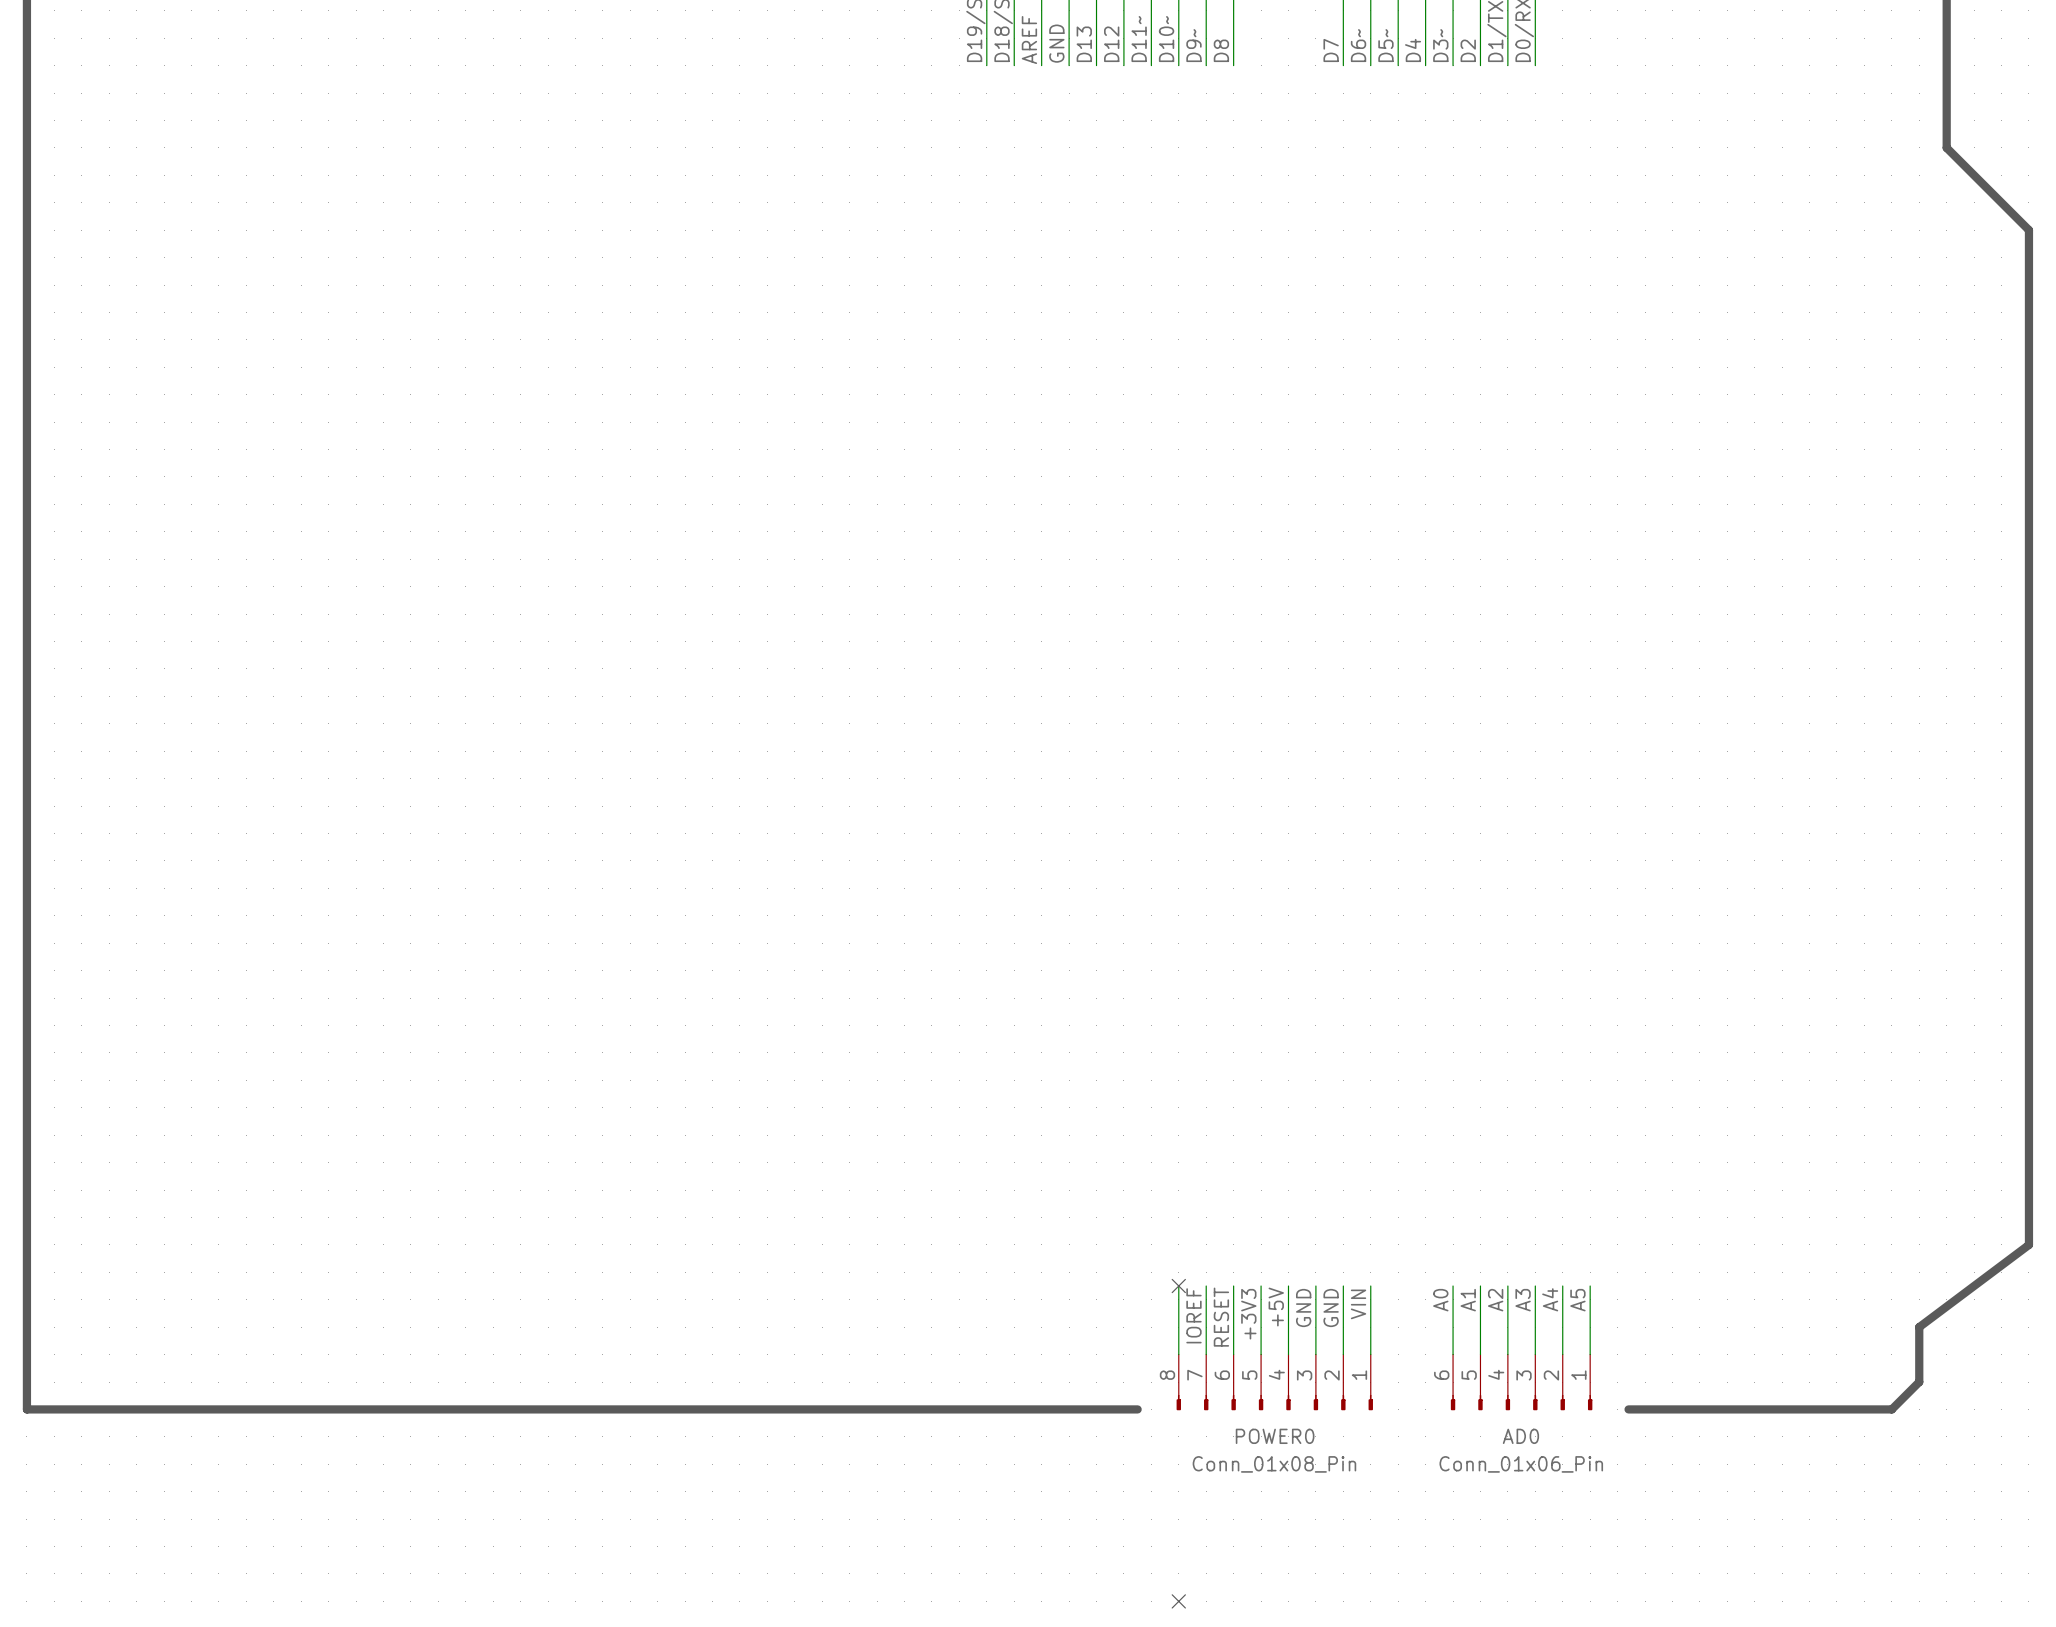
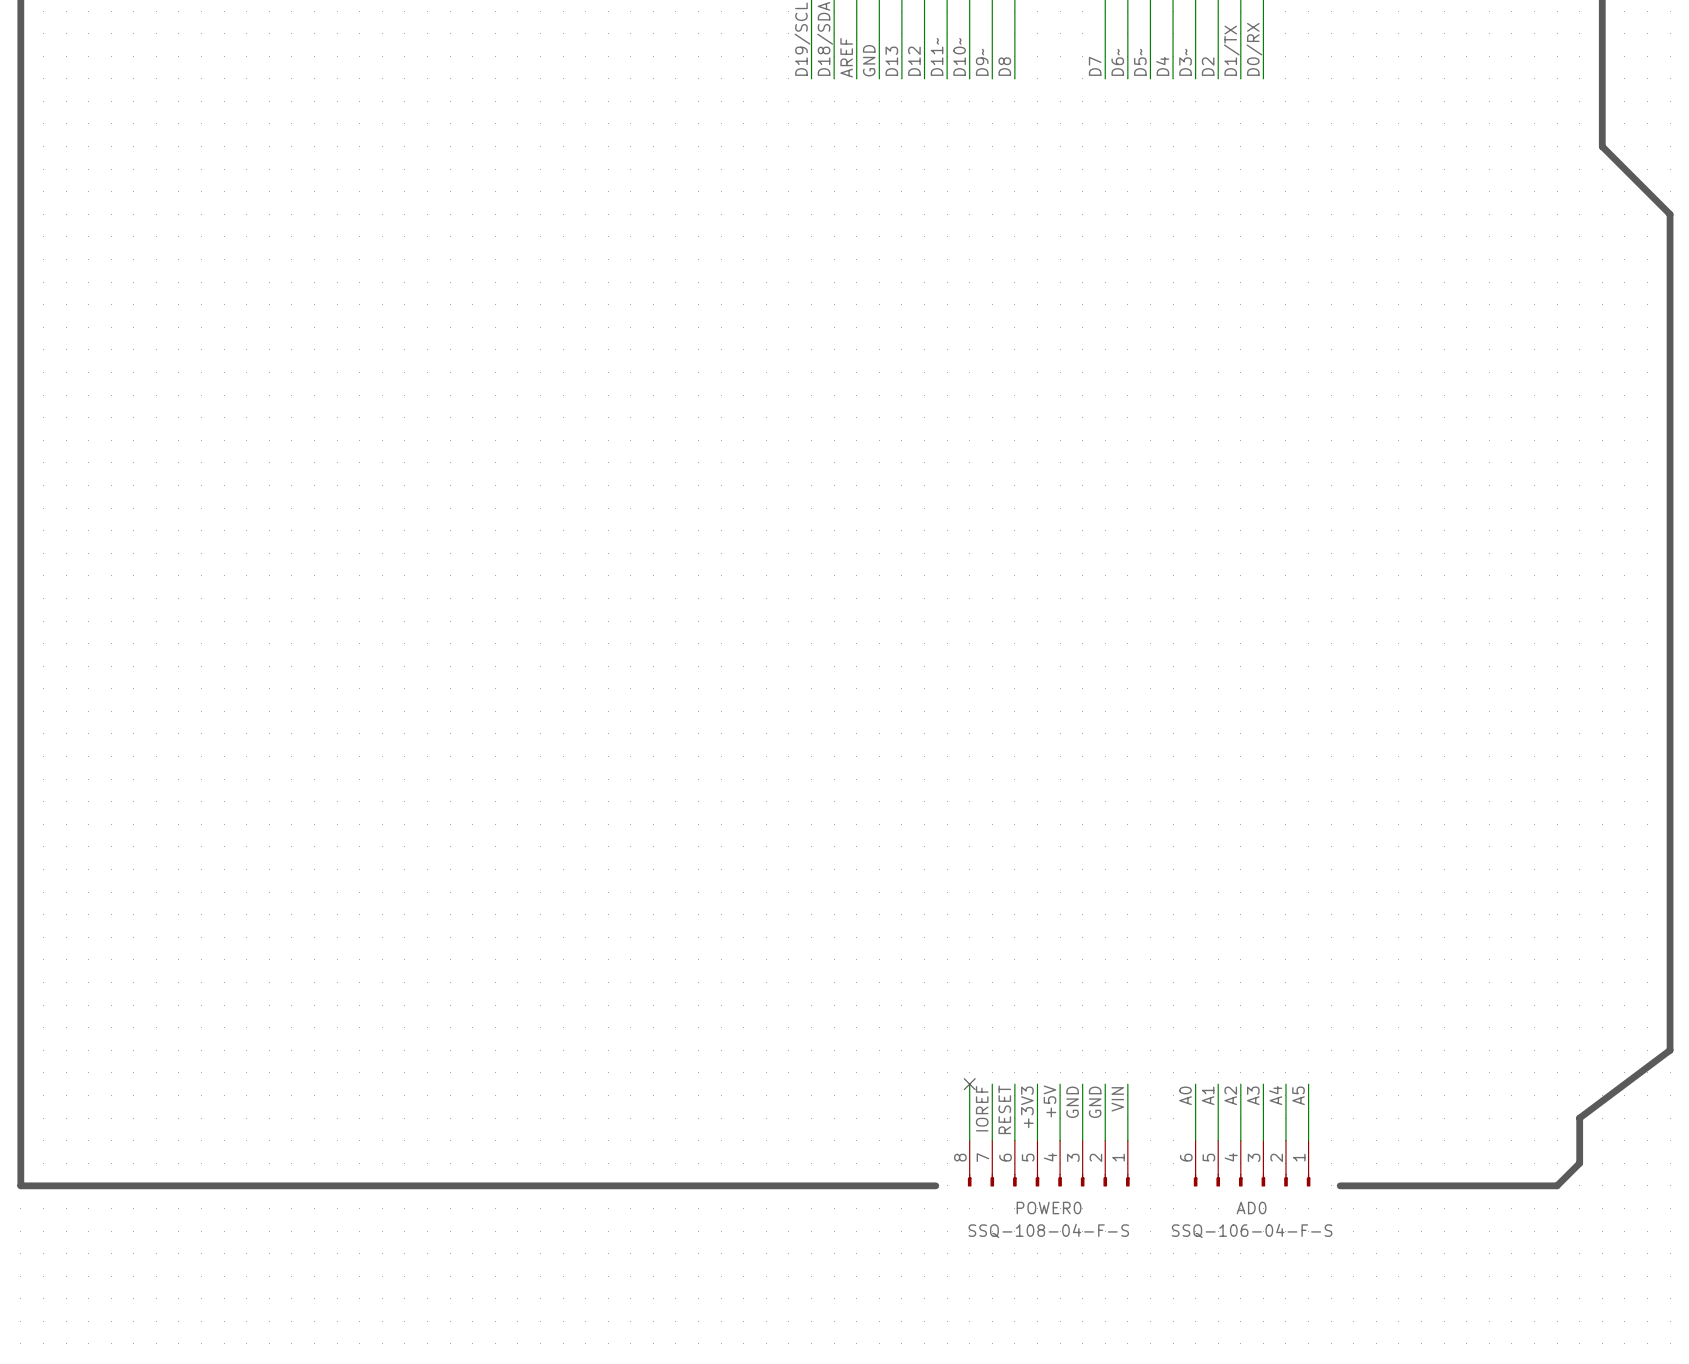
POWER0 value: Conn_01x08_Pin (1274, 1464) -> SSQ-108-04-F-S (1048, 1230)
AD0 value: Conn_01x06_Pin (1521, 1464) -> SSQ-106-04-F-S (1252, 1230)
no-connect mark: (1178, 1601) -> none

